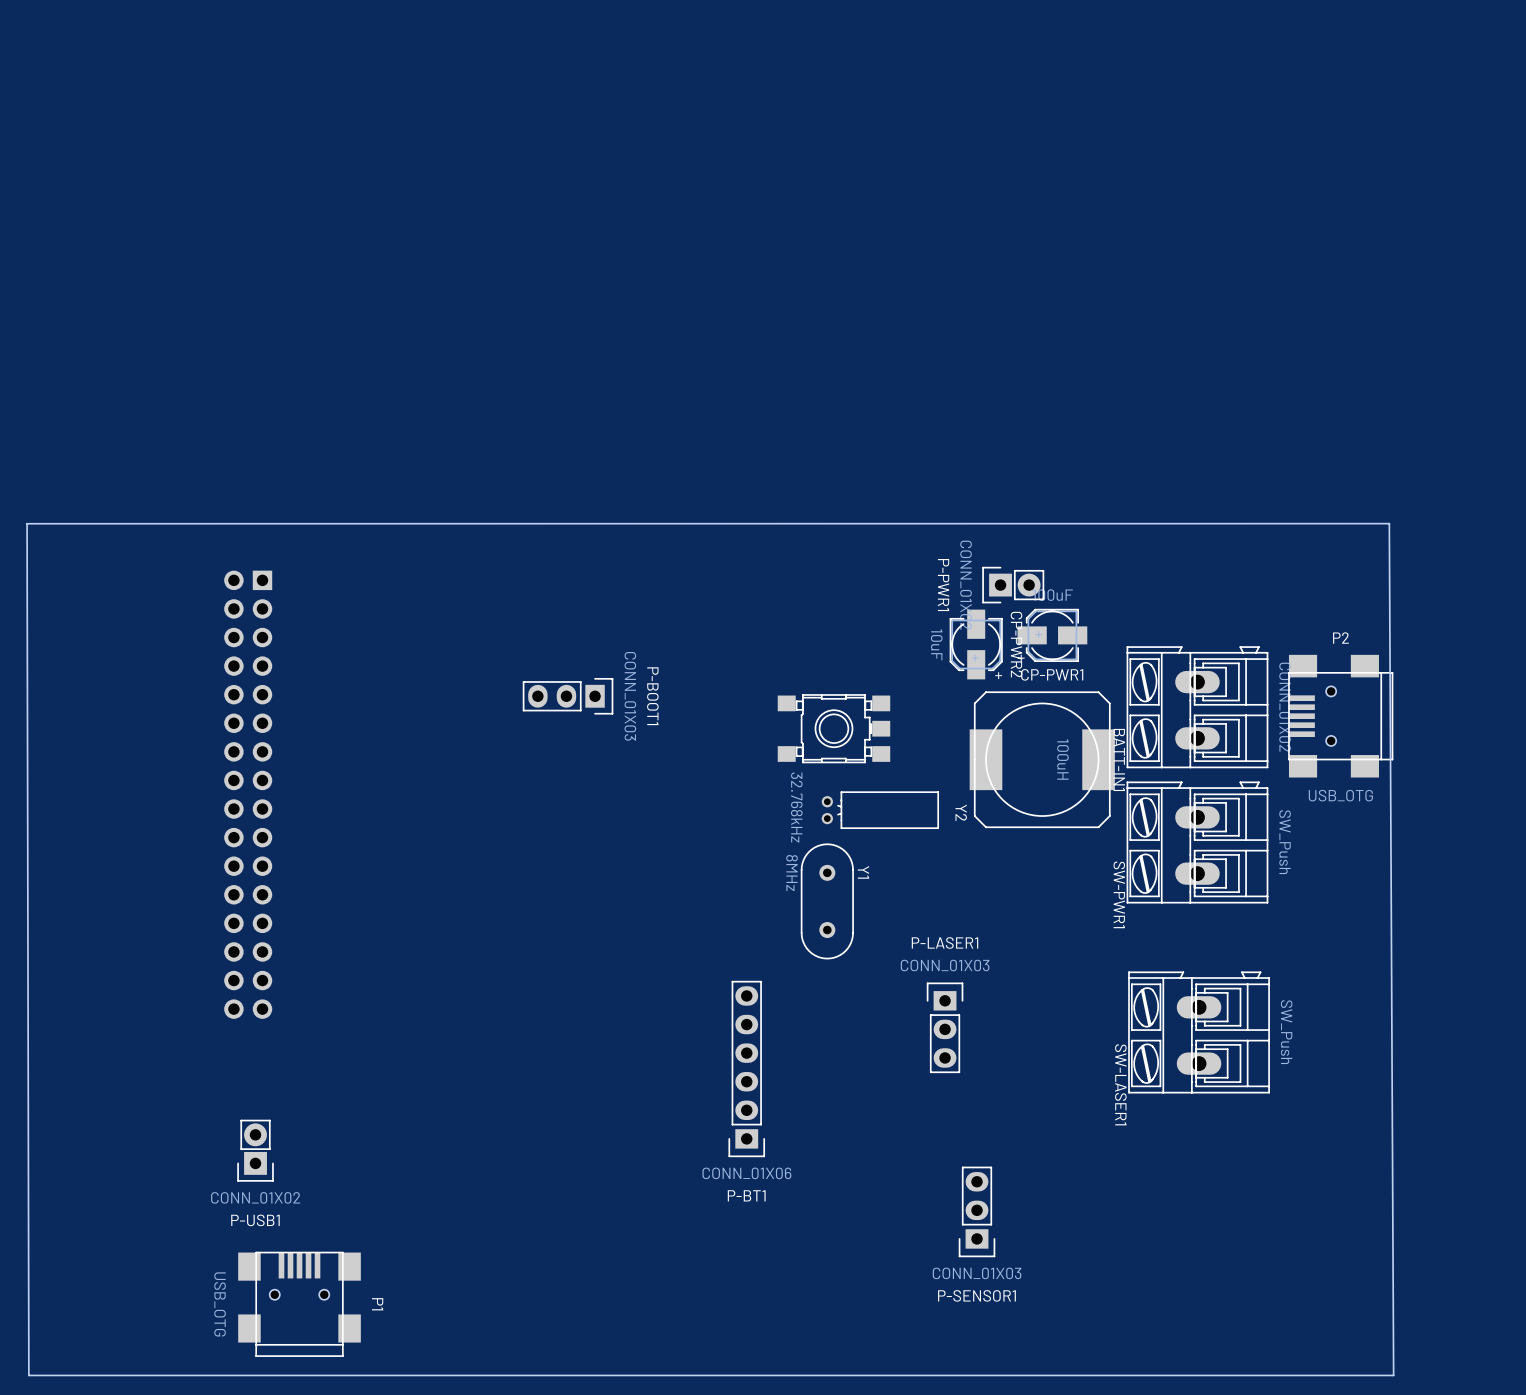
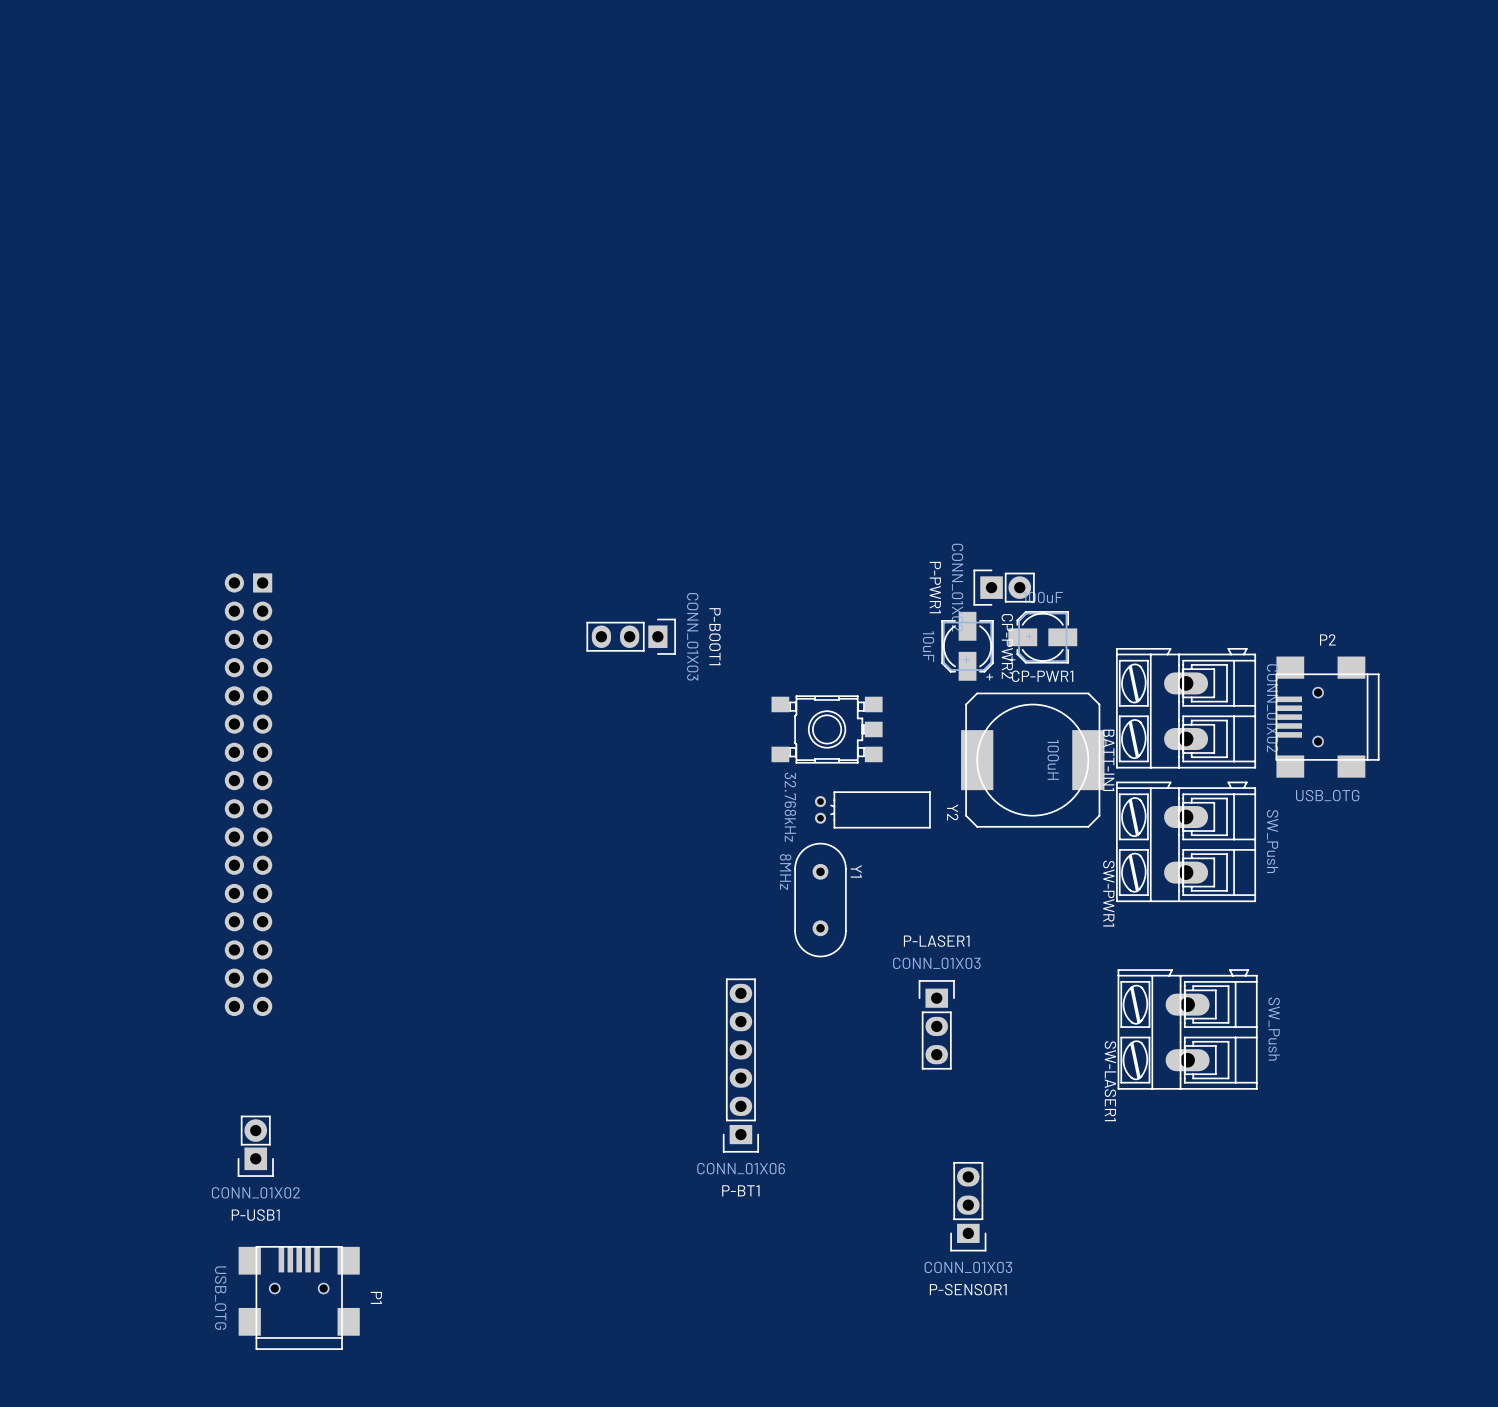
board edge: (1389, 523) (1393, 1375) (28, 1375) (27, 523) (1389, 523) -> none
P-BOOT1 position: (568, 696) -> (631, 636)

